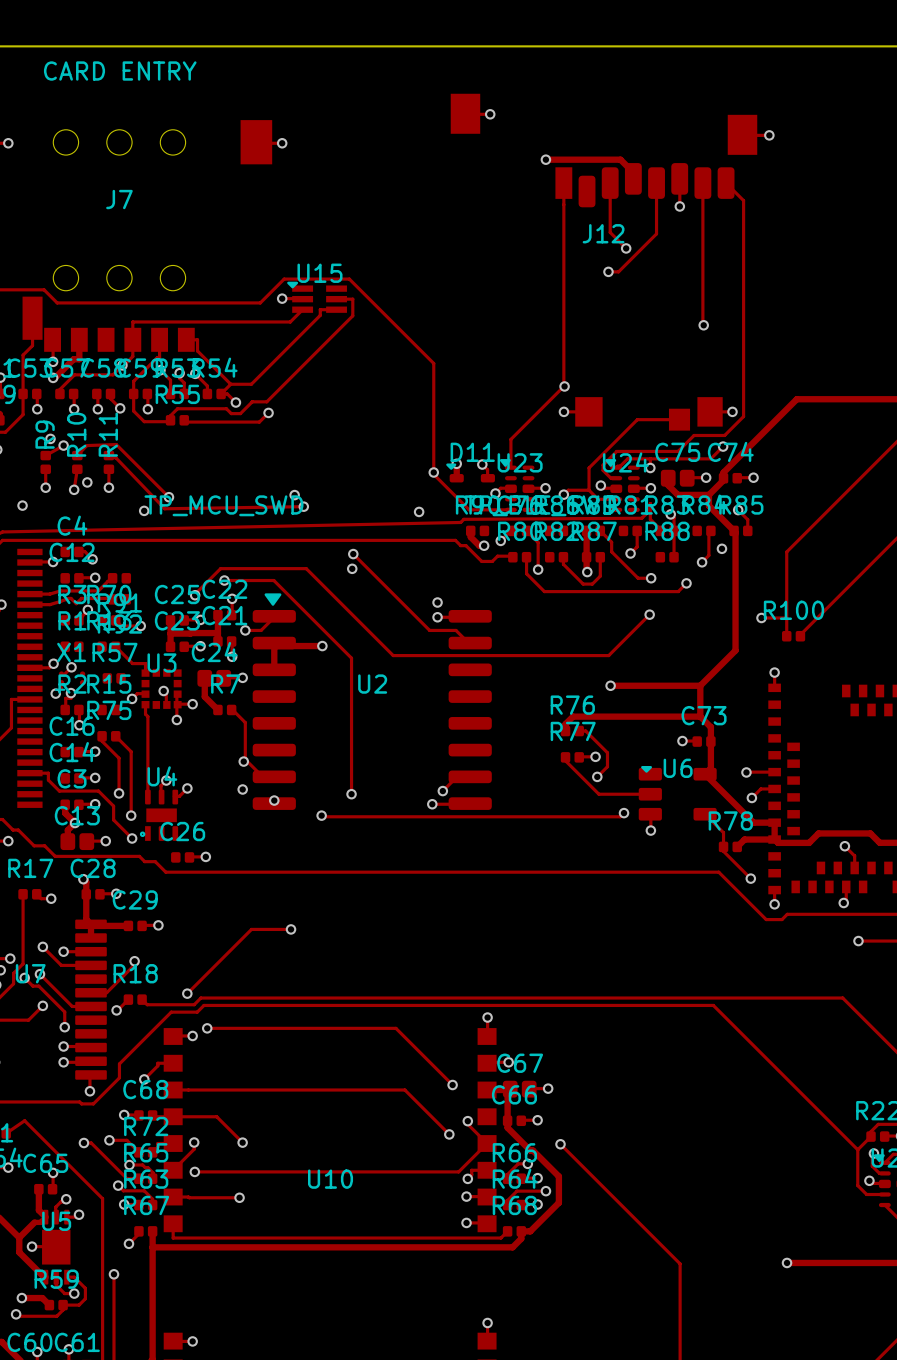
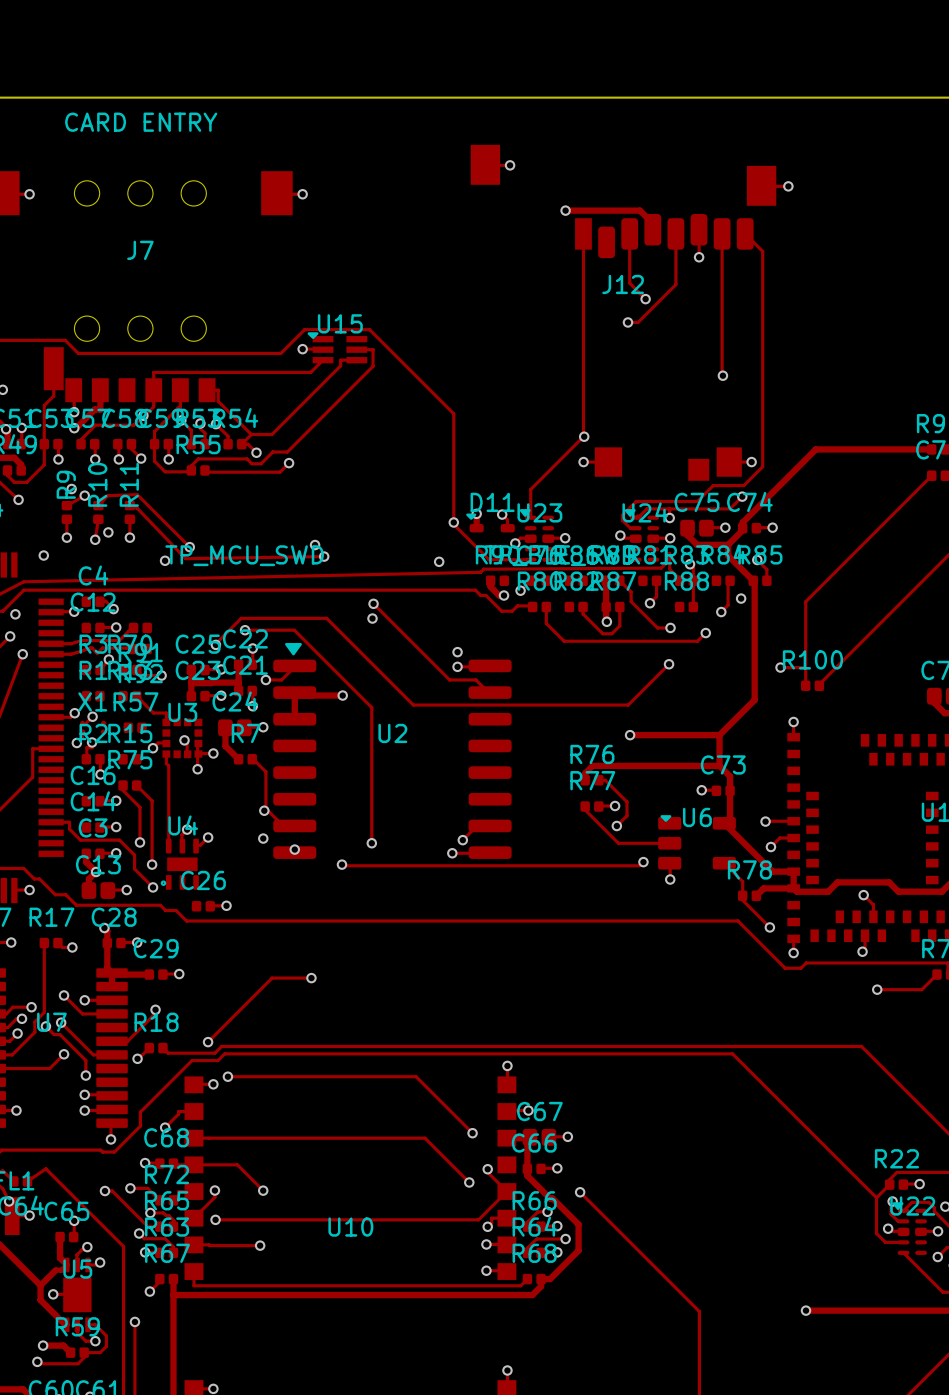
track: (679, 419) (637, 419) (589, 467) (589, 490) -> none
track: (589, 490) (598, 499) (616, 499) -> none
track: (589, 490) (568, 490) (563, 494) -> none
via: (563, 494) -> none
track: (526, 530) (538, 542) (538, 569) -> none
via: (538, 569) -> none

